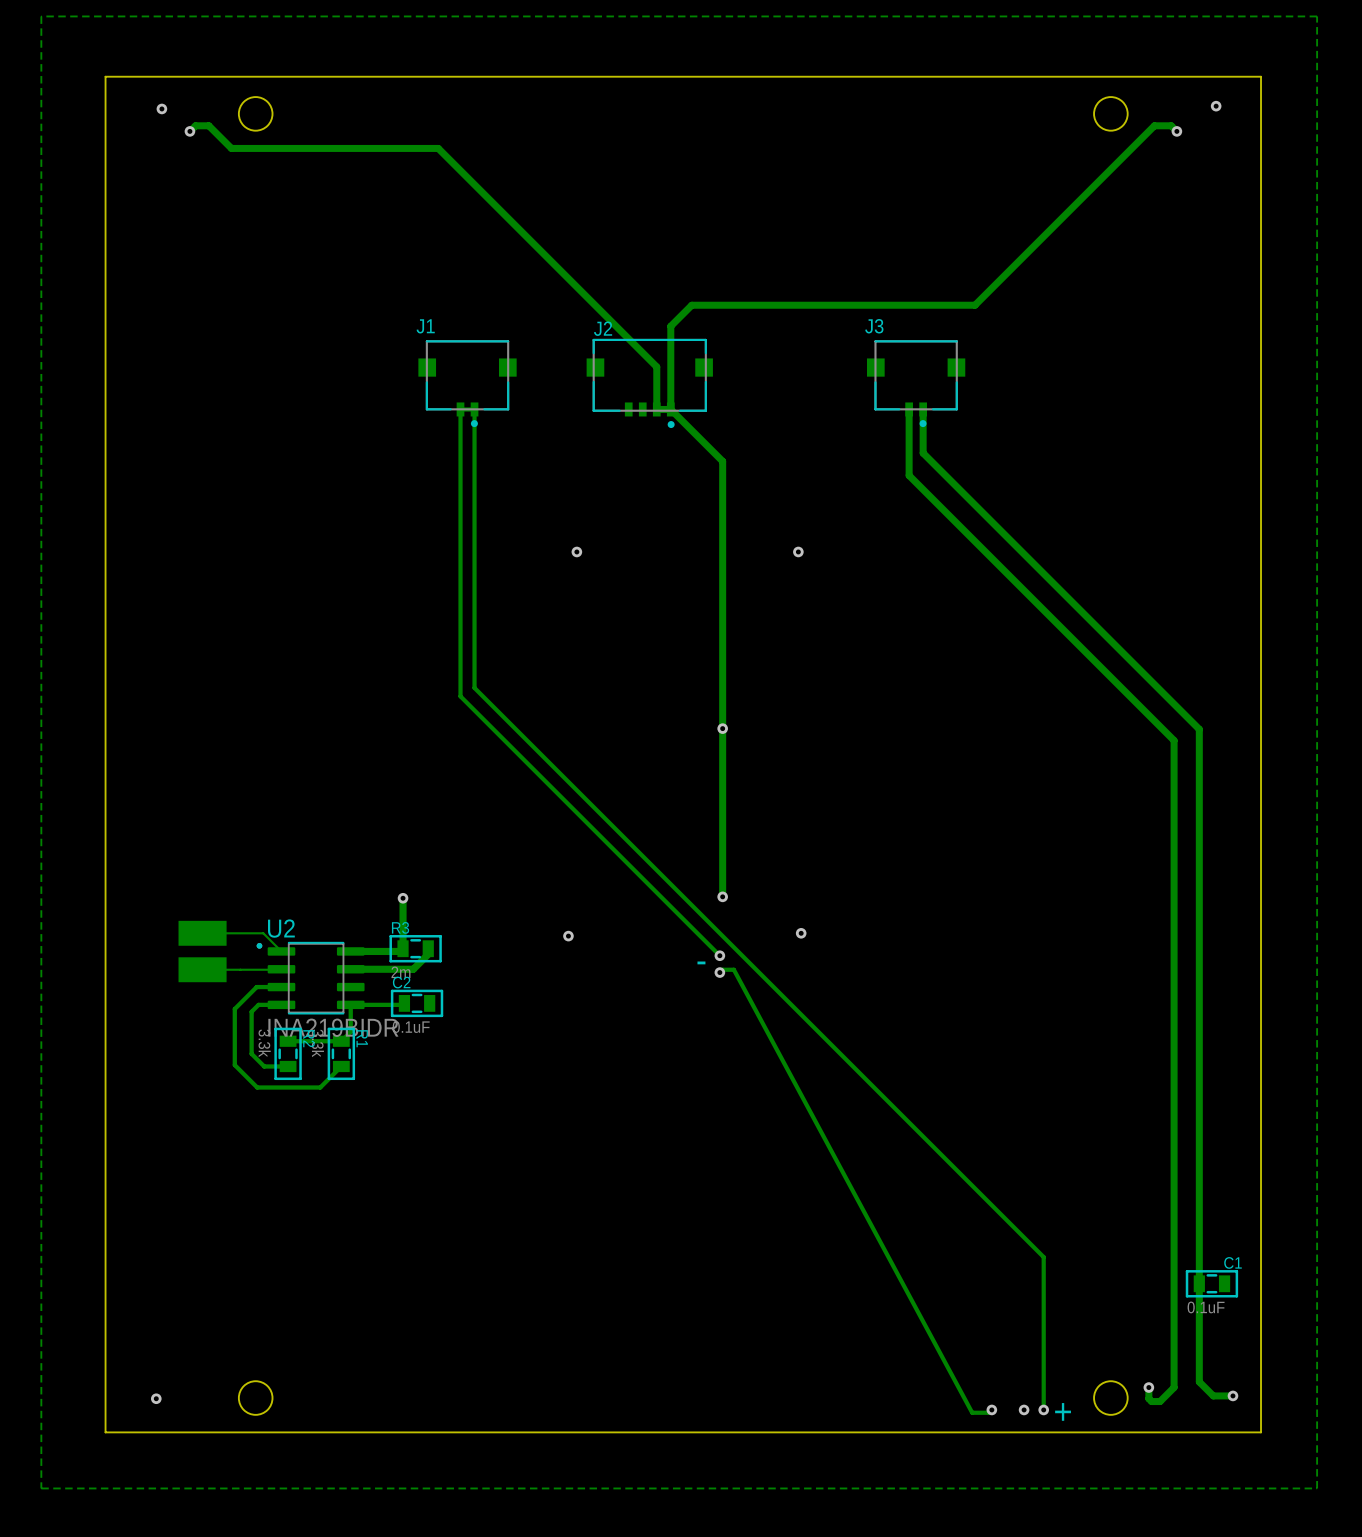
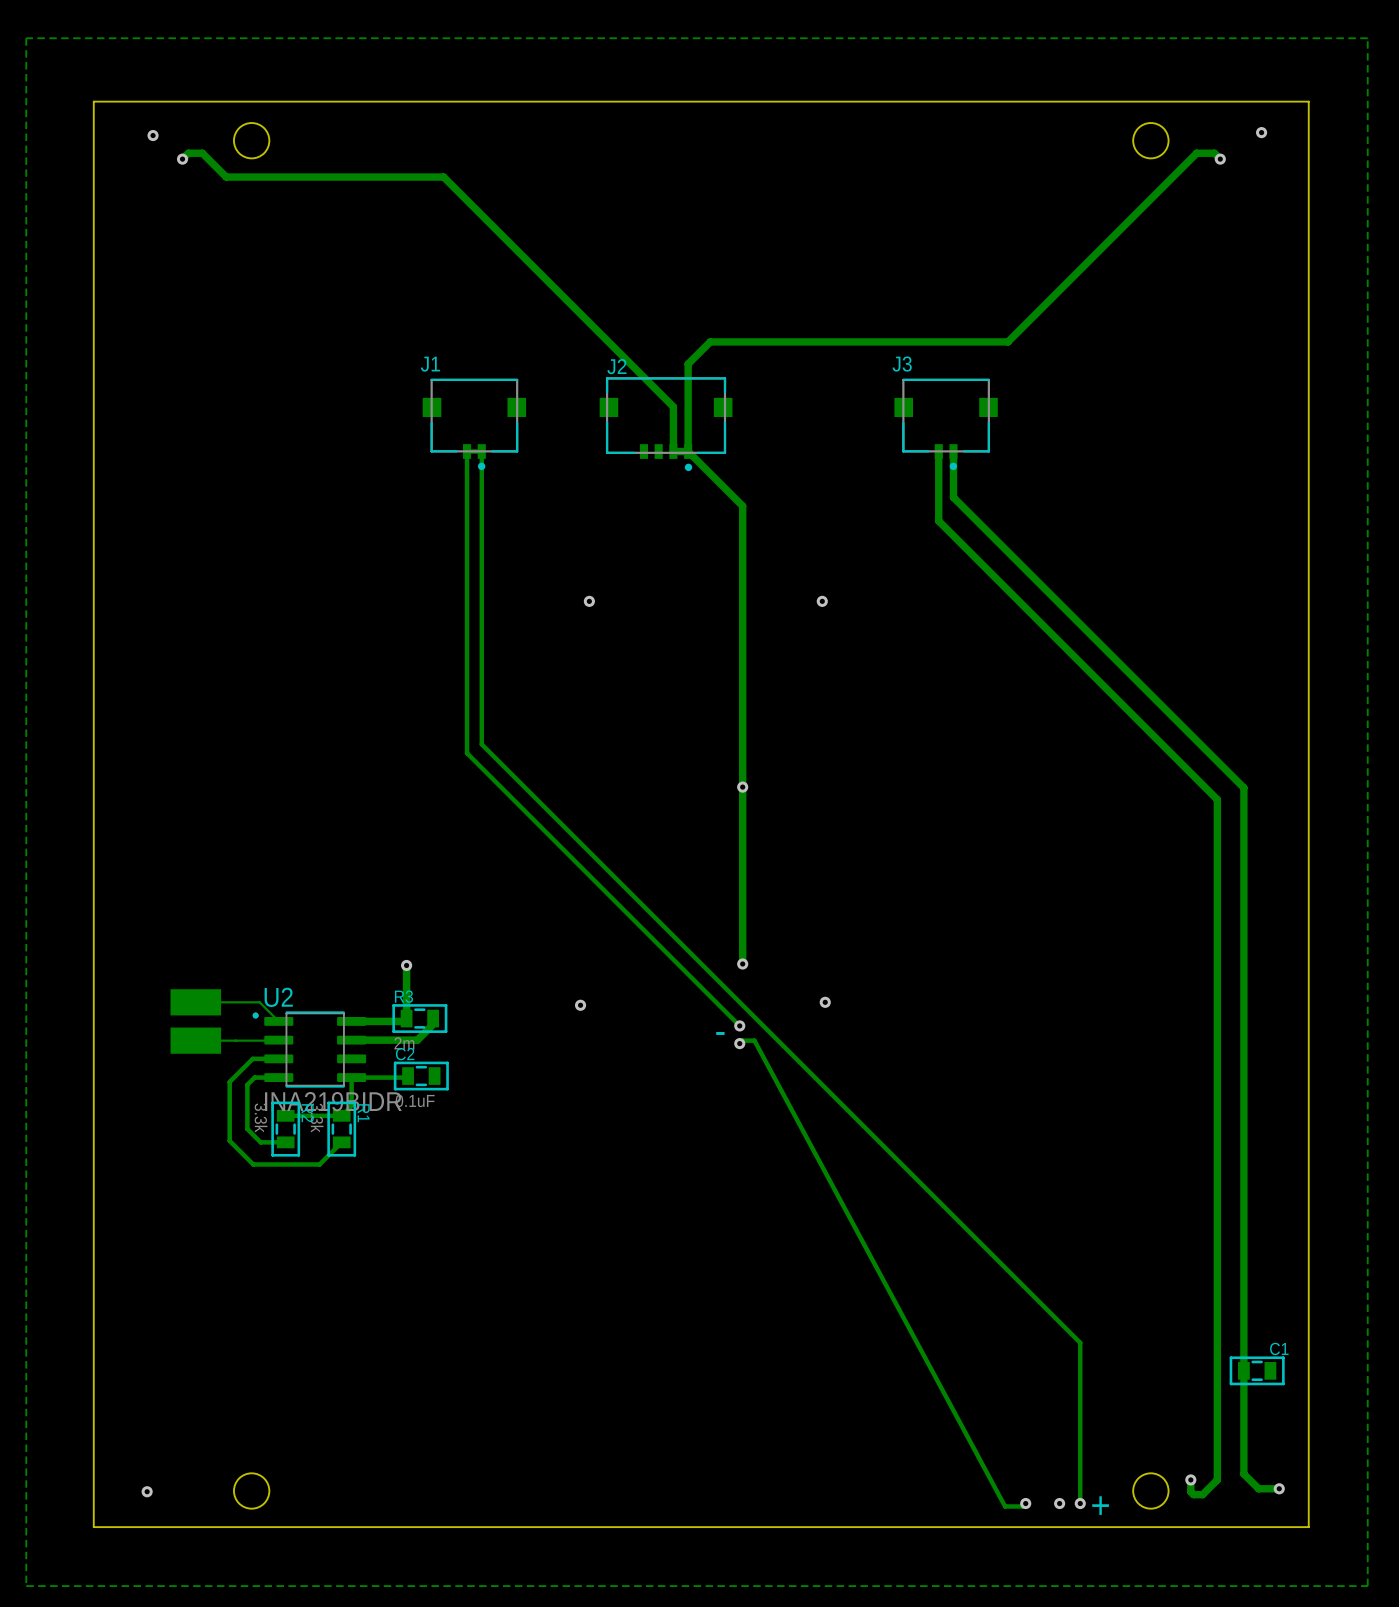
C1 value: 0.1uF (1206, 1307) -> none

